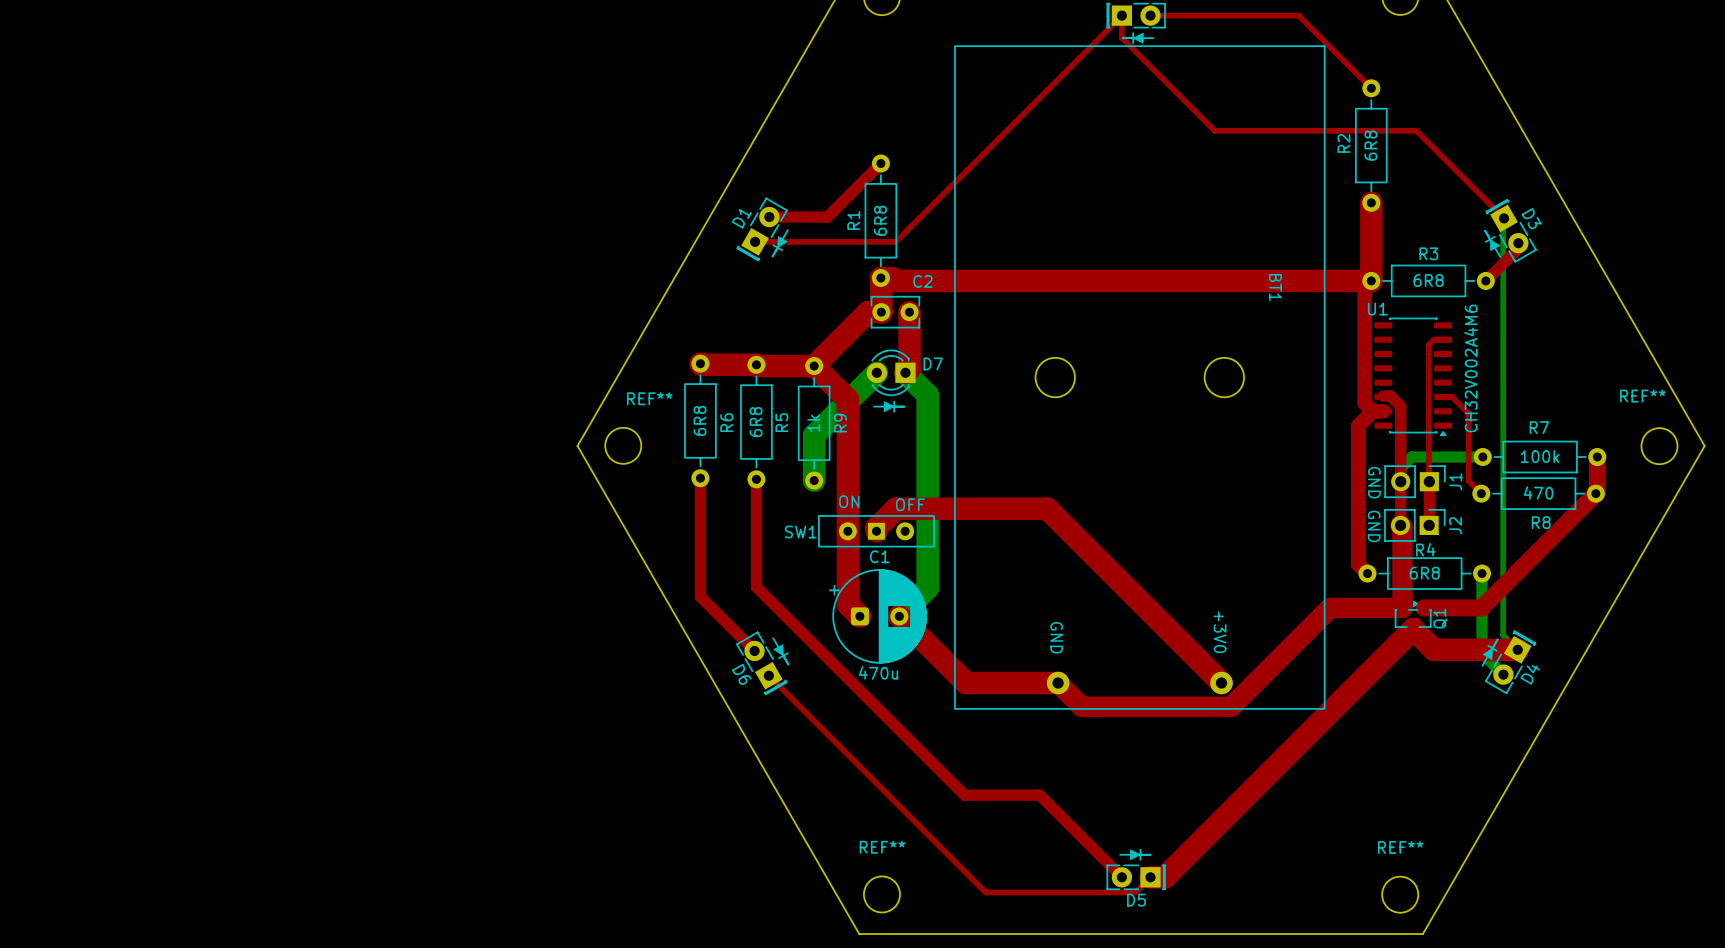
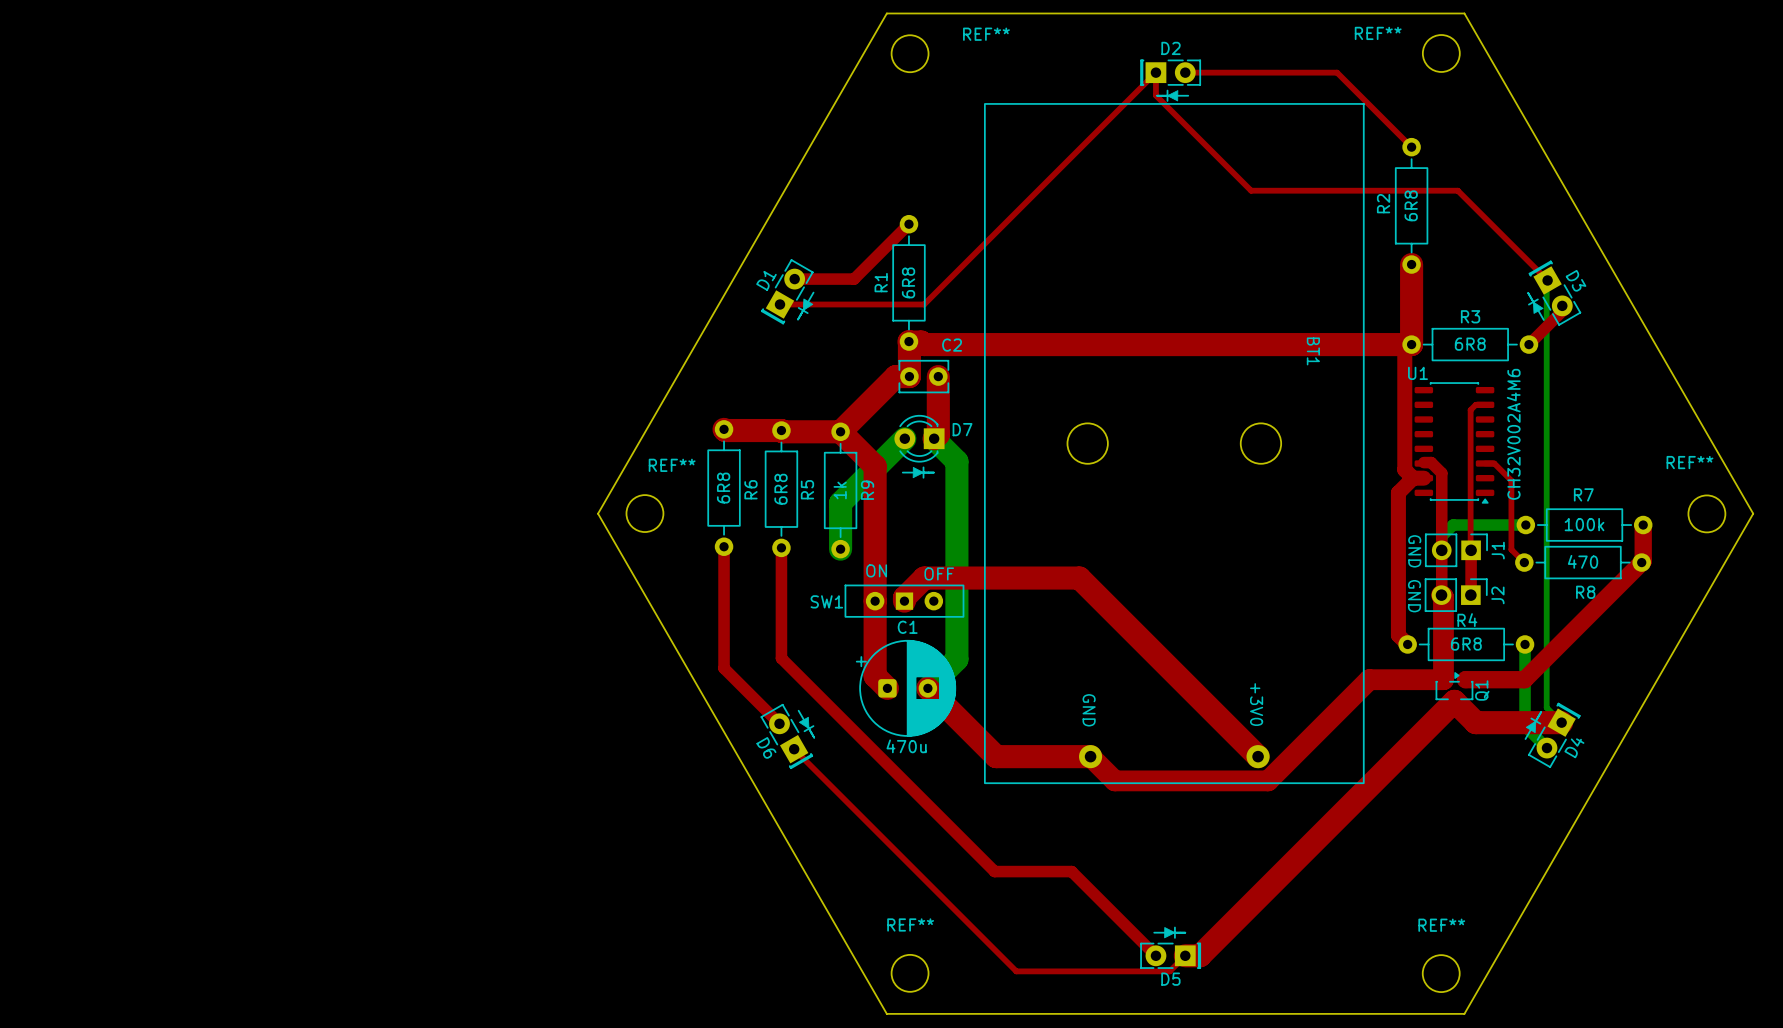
D7 footprint: [866, 349, 916, 413] -> [894, 415, 945, 463]
drawing: none -> [902, 466, 935, 479]

